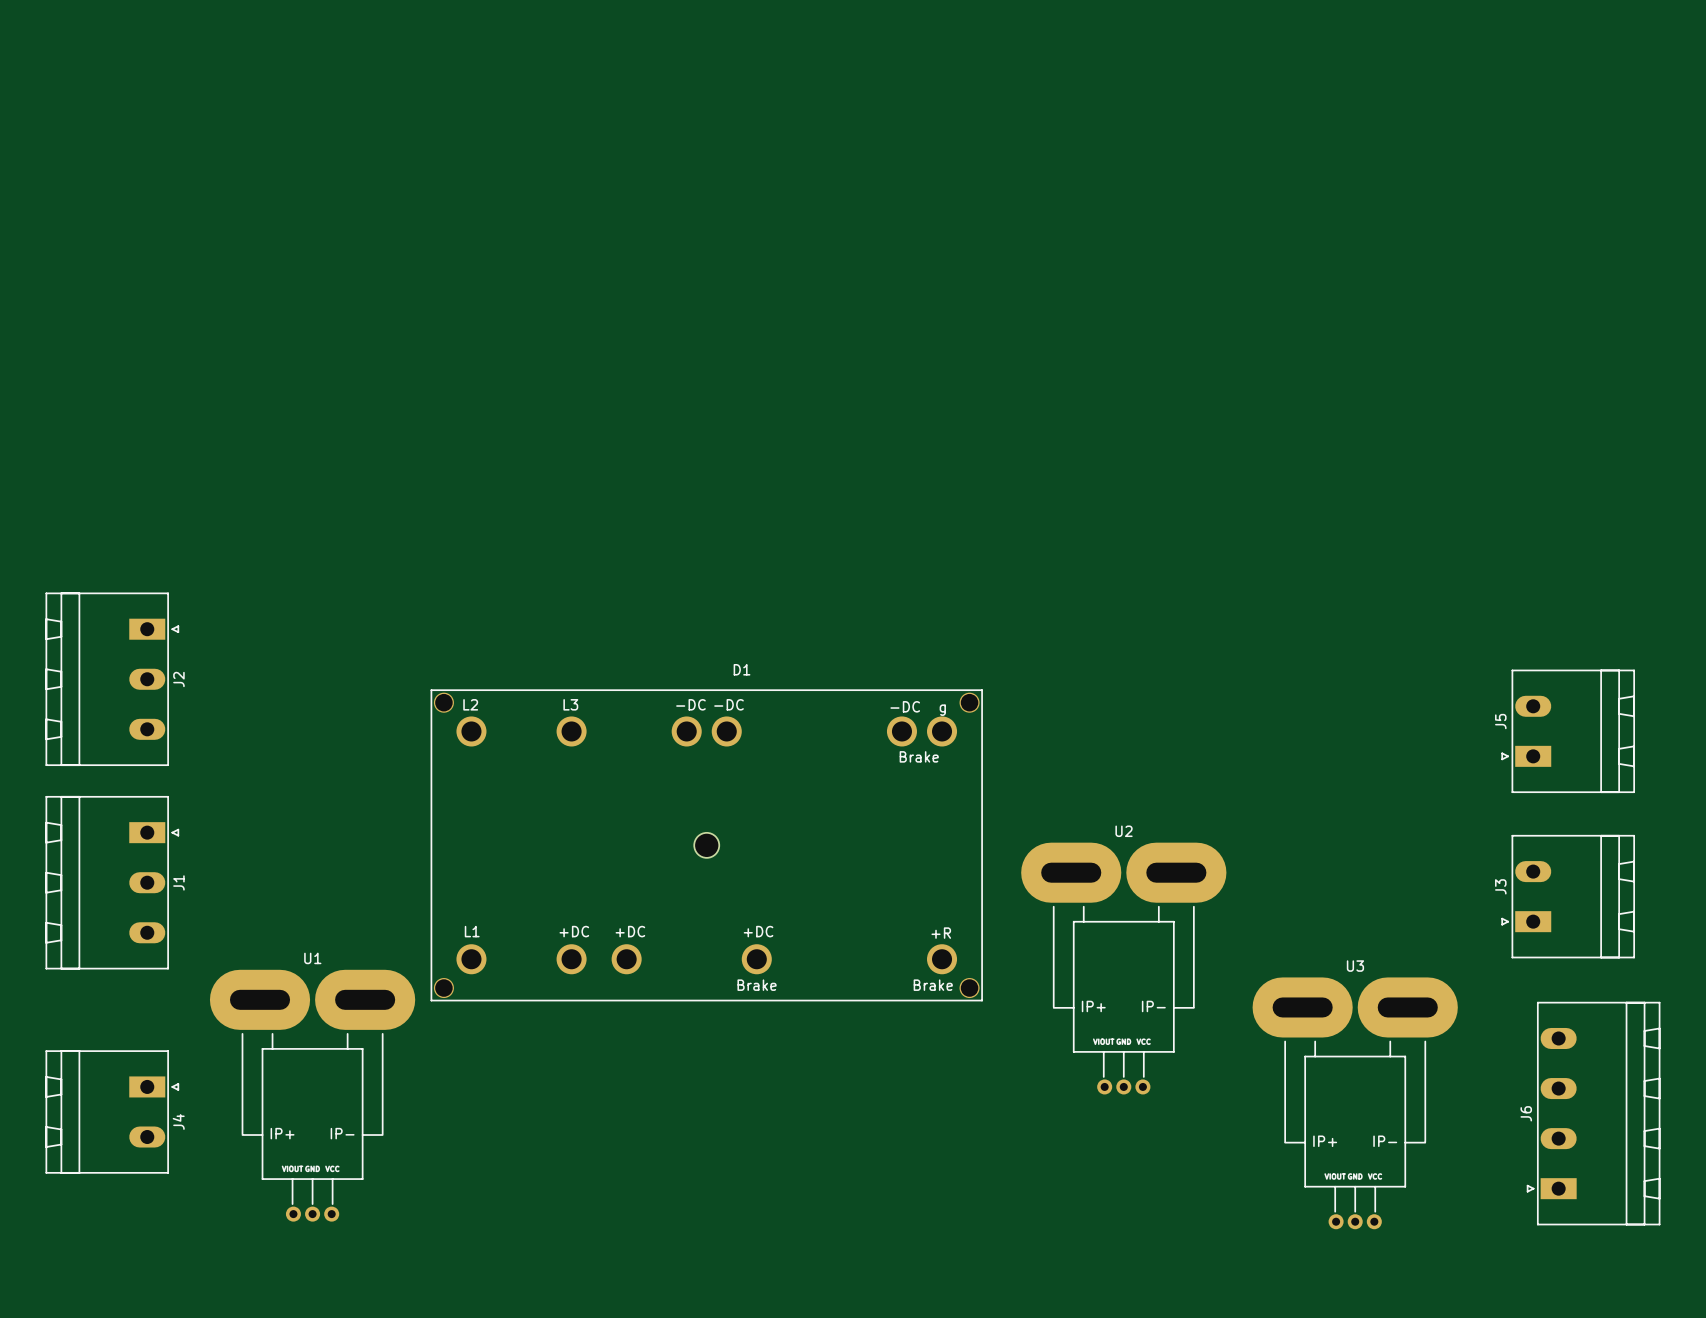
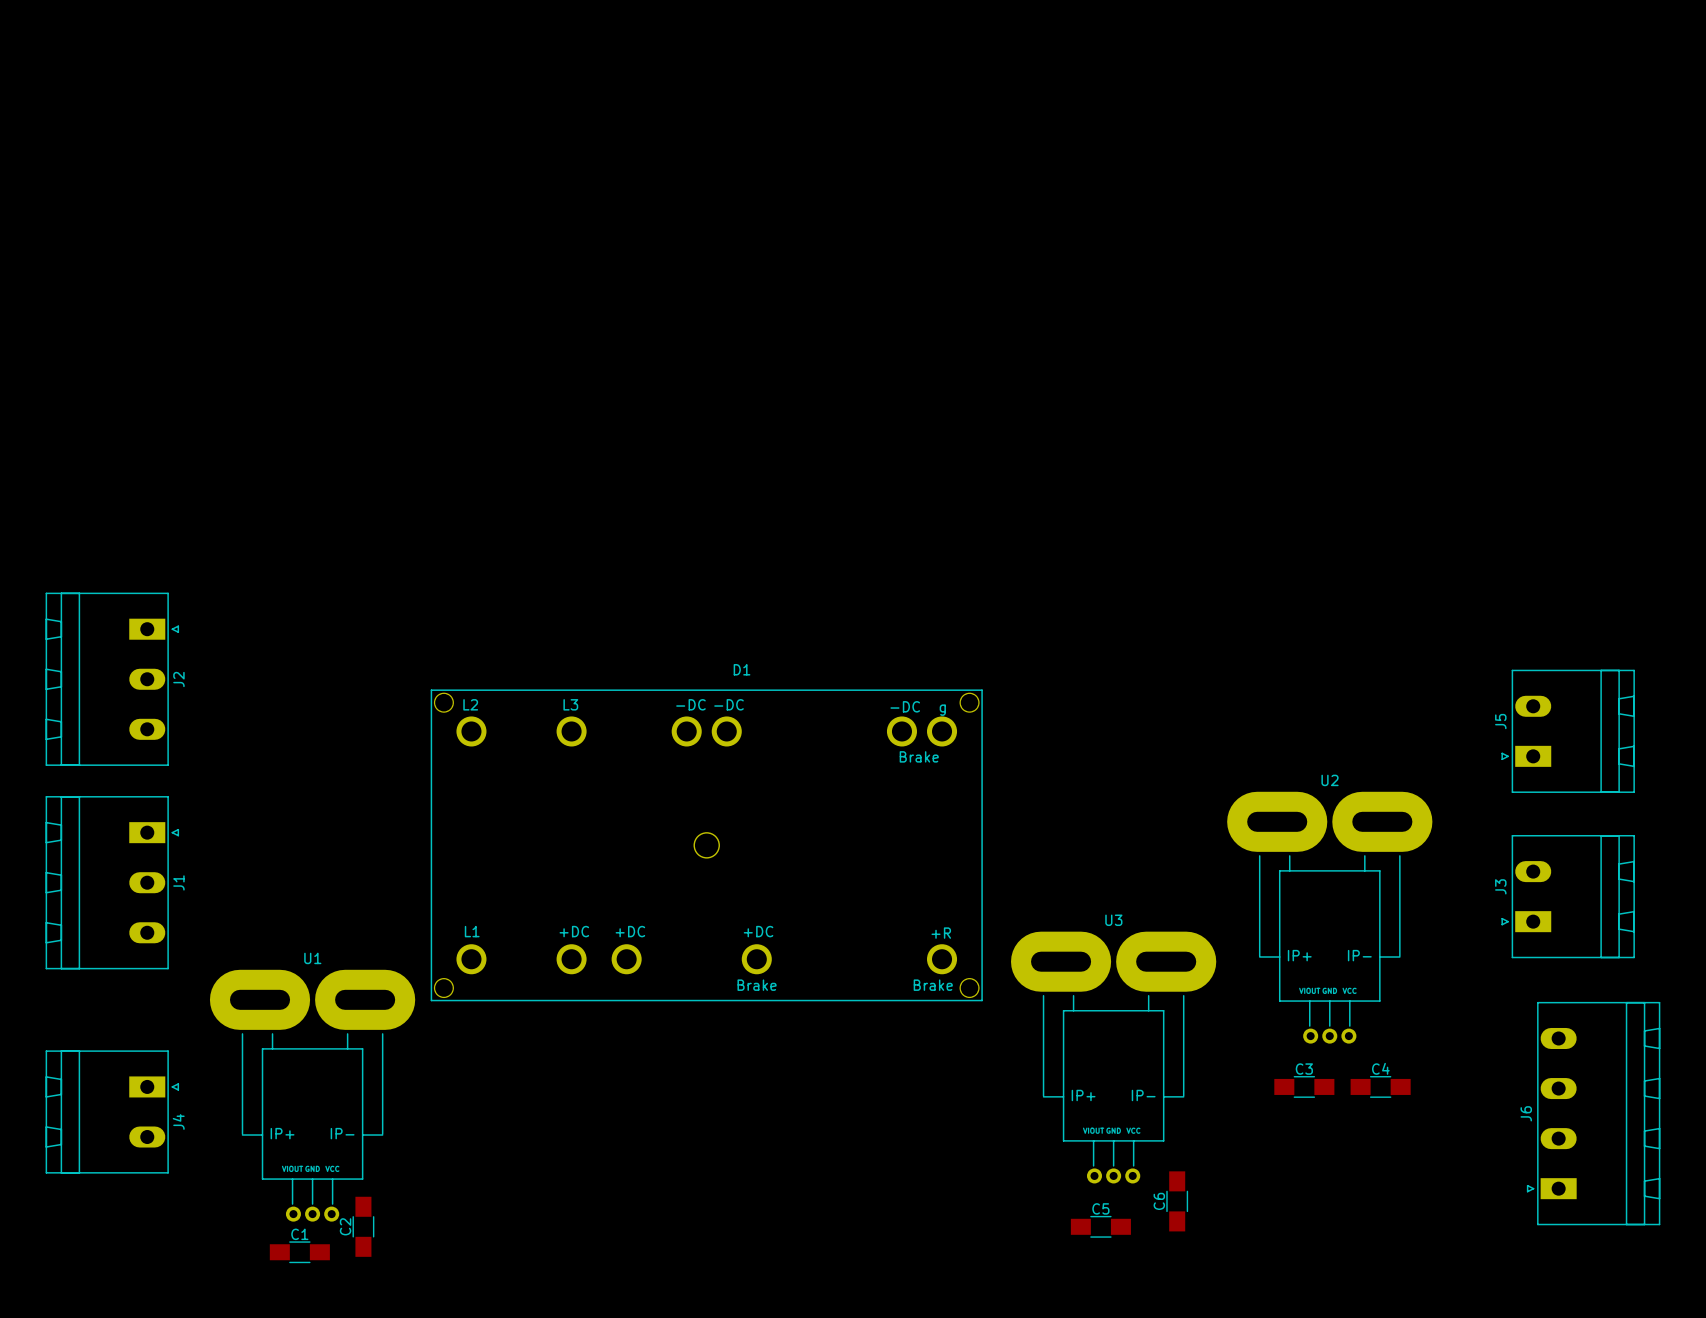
U2 position: (1123, 968) -> (1329, 917)
C3: none -> (1304, 1086)
C4: none -> (1380, 1086)
U3 position: (1355, 1103) -> (1113, 1057)
C6: none -> (1177, 1201)
C2: none -> (363, 1226)
C5: none -> (1100, 1226)
C1: none -> (299, 1252)

